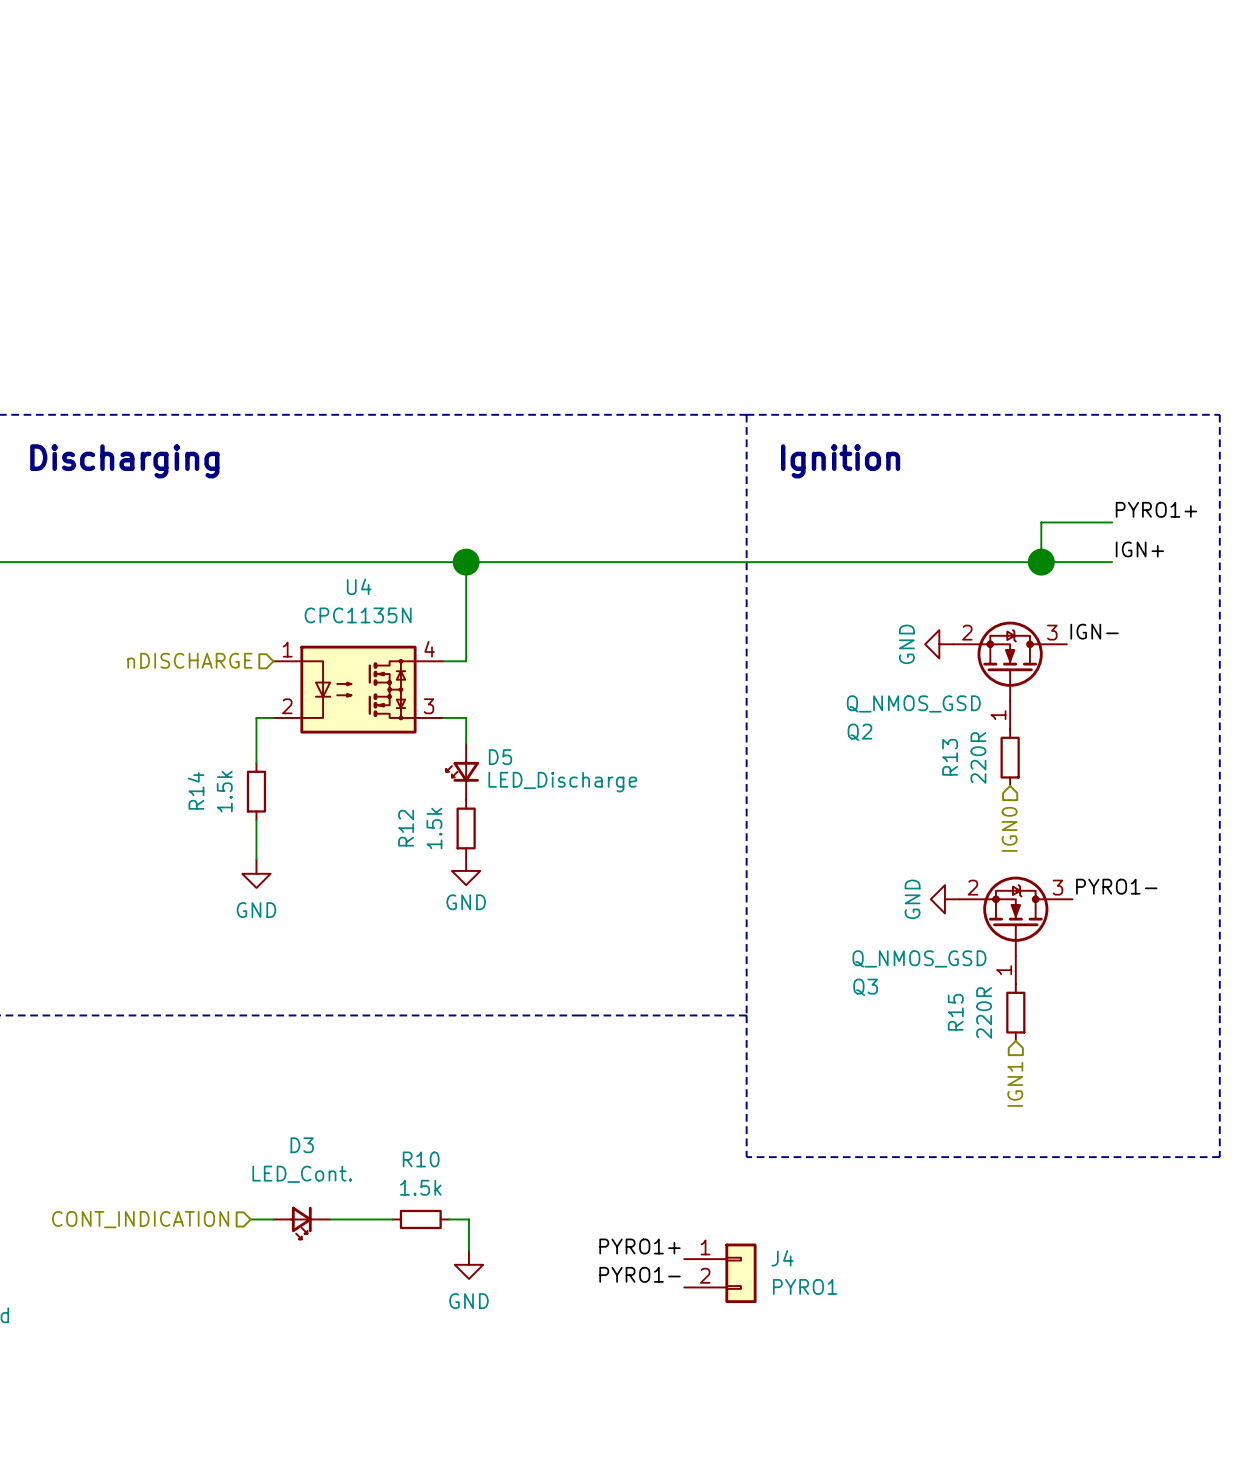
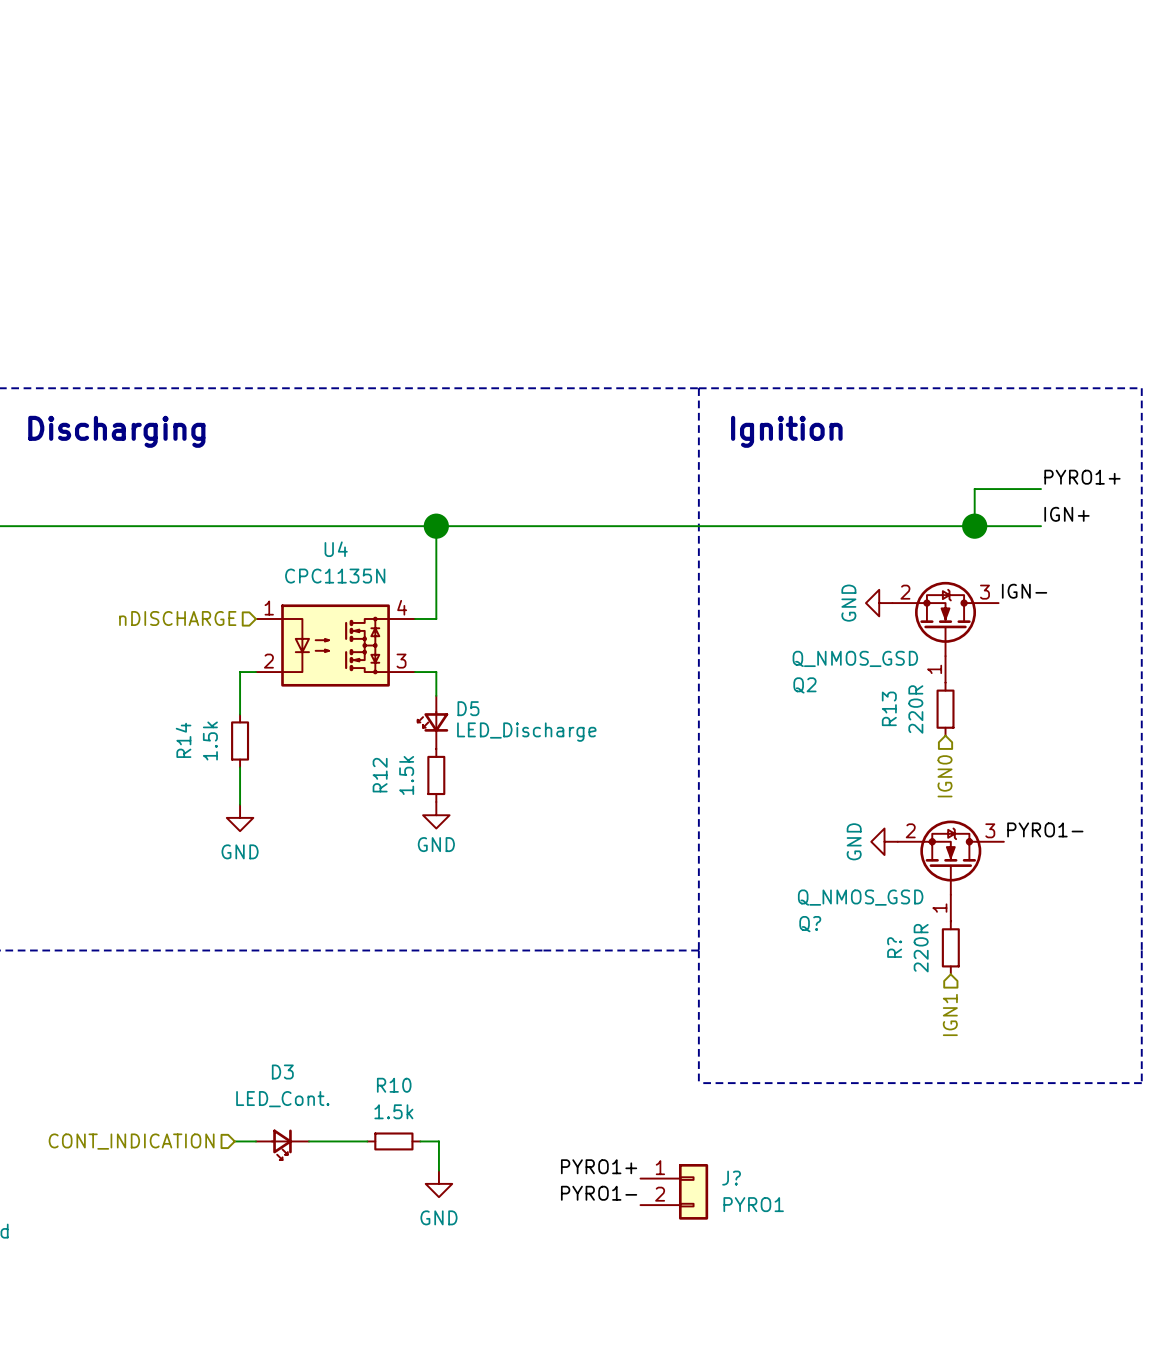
Q3 name: Q3 (865, 987) -> Q? (810, 924)
R15 name: R15 (955, 1012) -> R? (894, 947)
J4 name: J4 (782, 1258) -> J? (731, 1178)

